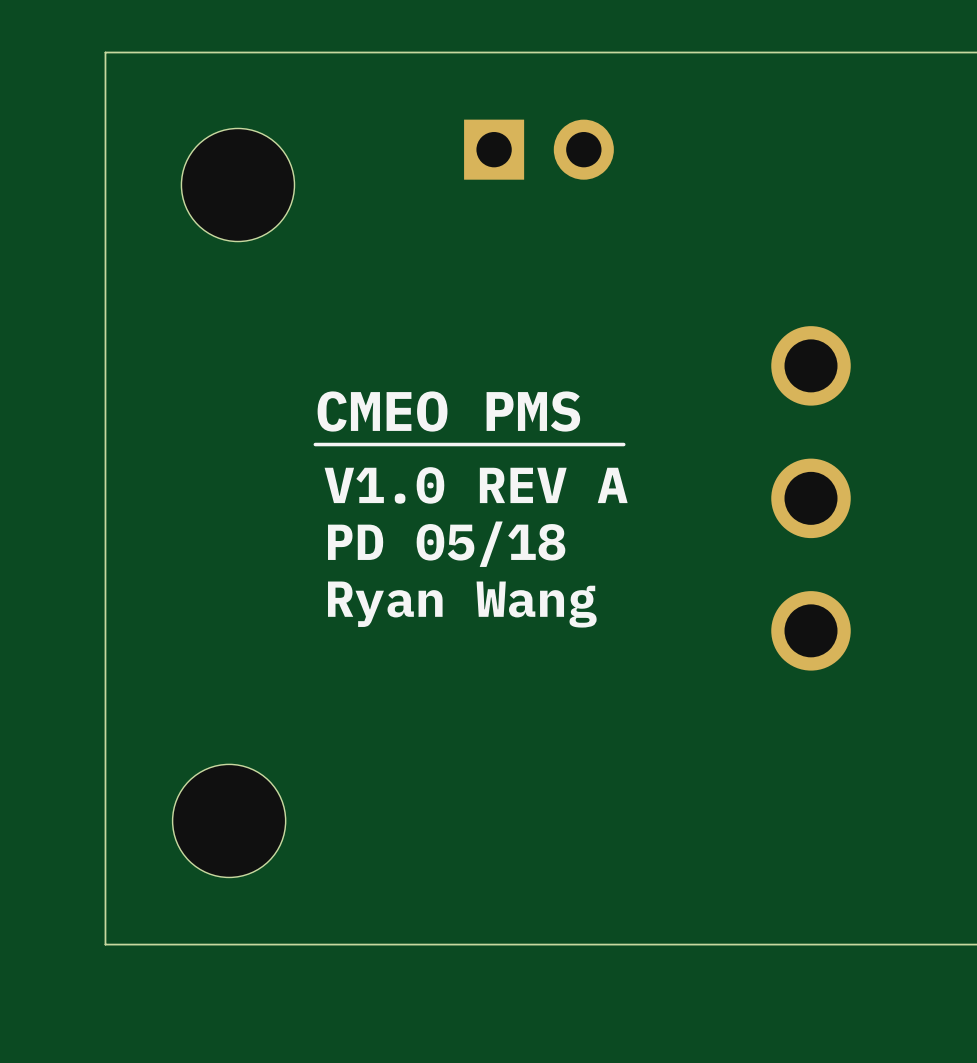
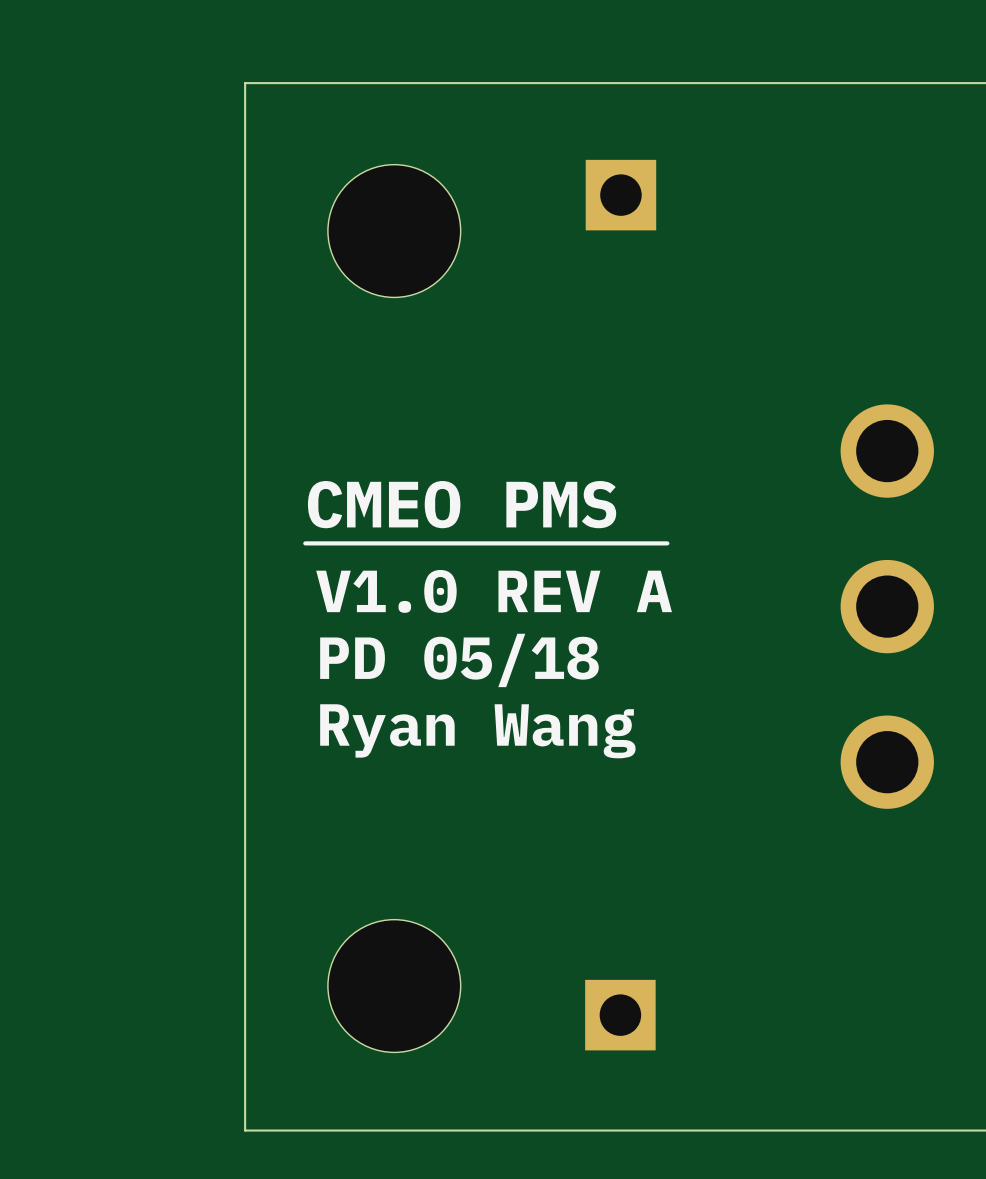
board edge: (264, 52) (105, 52) (105, 944) (264, 944) -> (245, 83) (245, 1130)
part: none -> (620, 195)
part: (538, 149) -> none
part position: (237, 184) -> (394, 231)
part position: (229, 820) -> (394, 986)
part: none -> (620, 1015)

